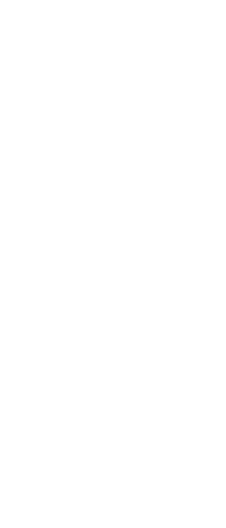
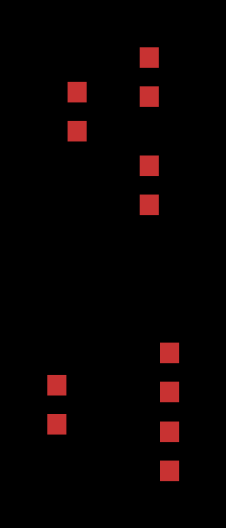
part: none -> (149, 77)
part: none -> (77, 111)
part: none -> (149, 185)
part: none -> (169, 372)
part: none -> (56, 404)
part: none -> (169, 451)

